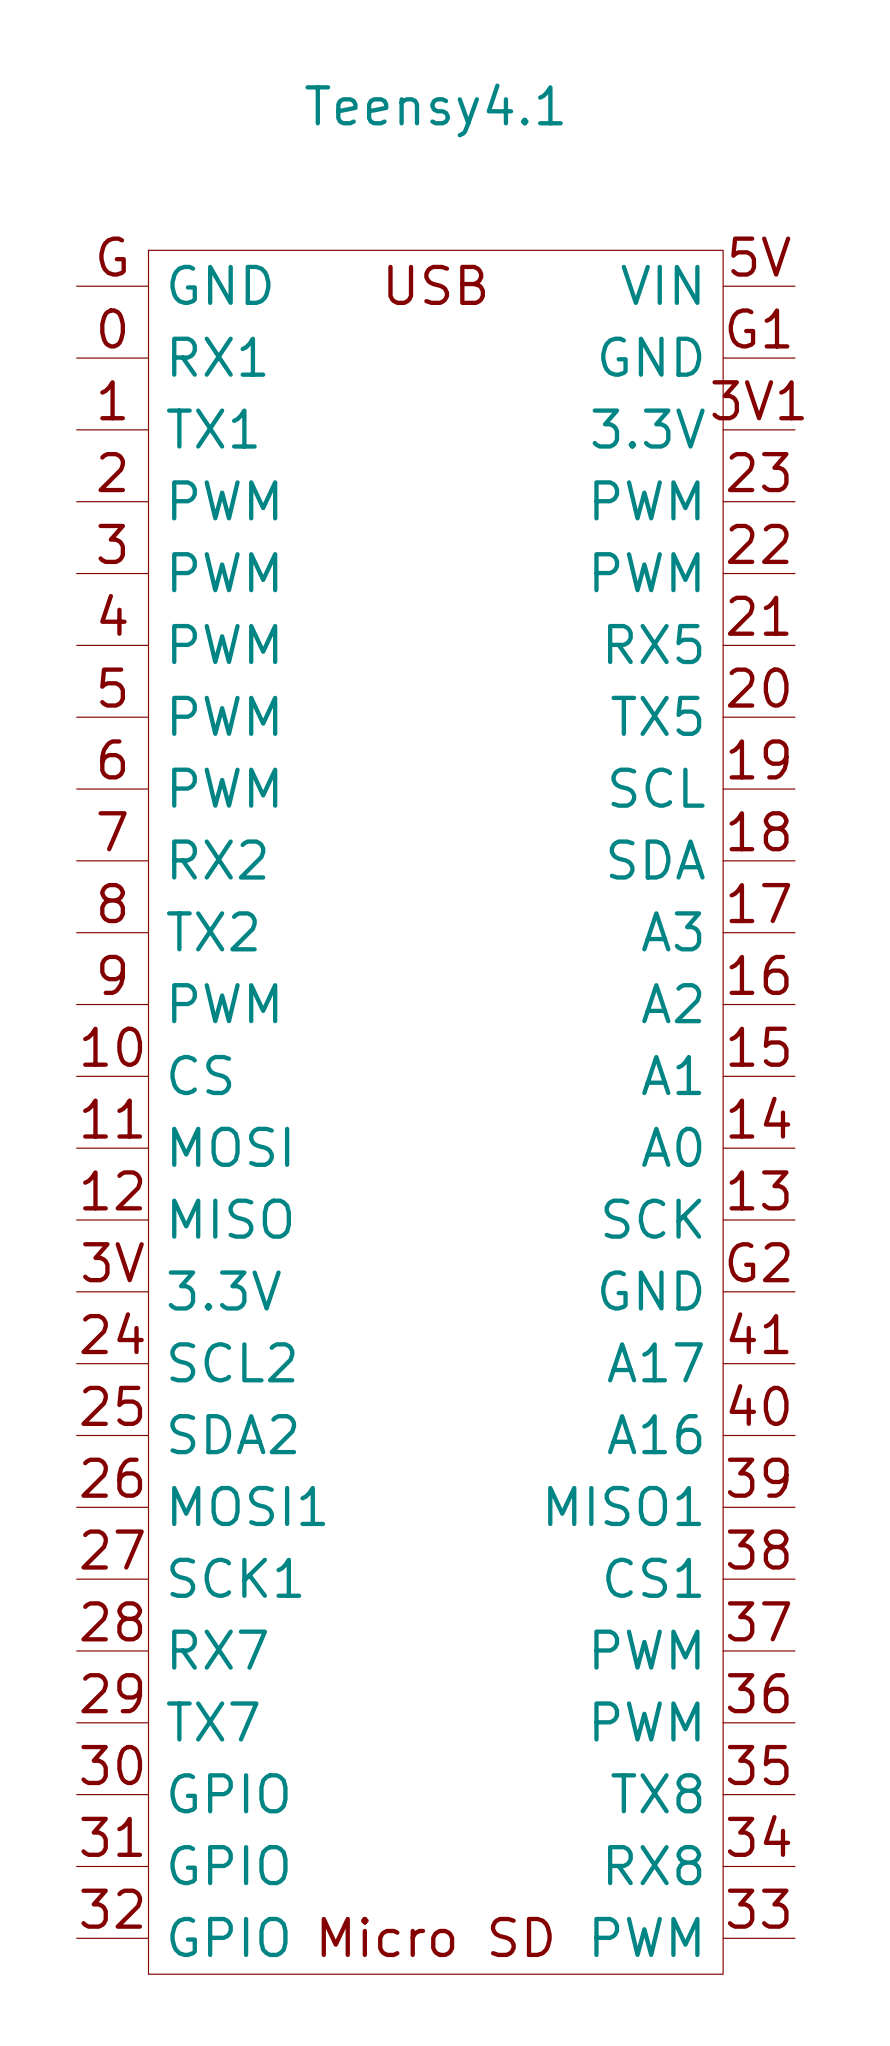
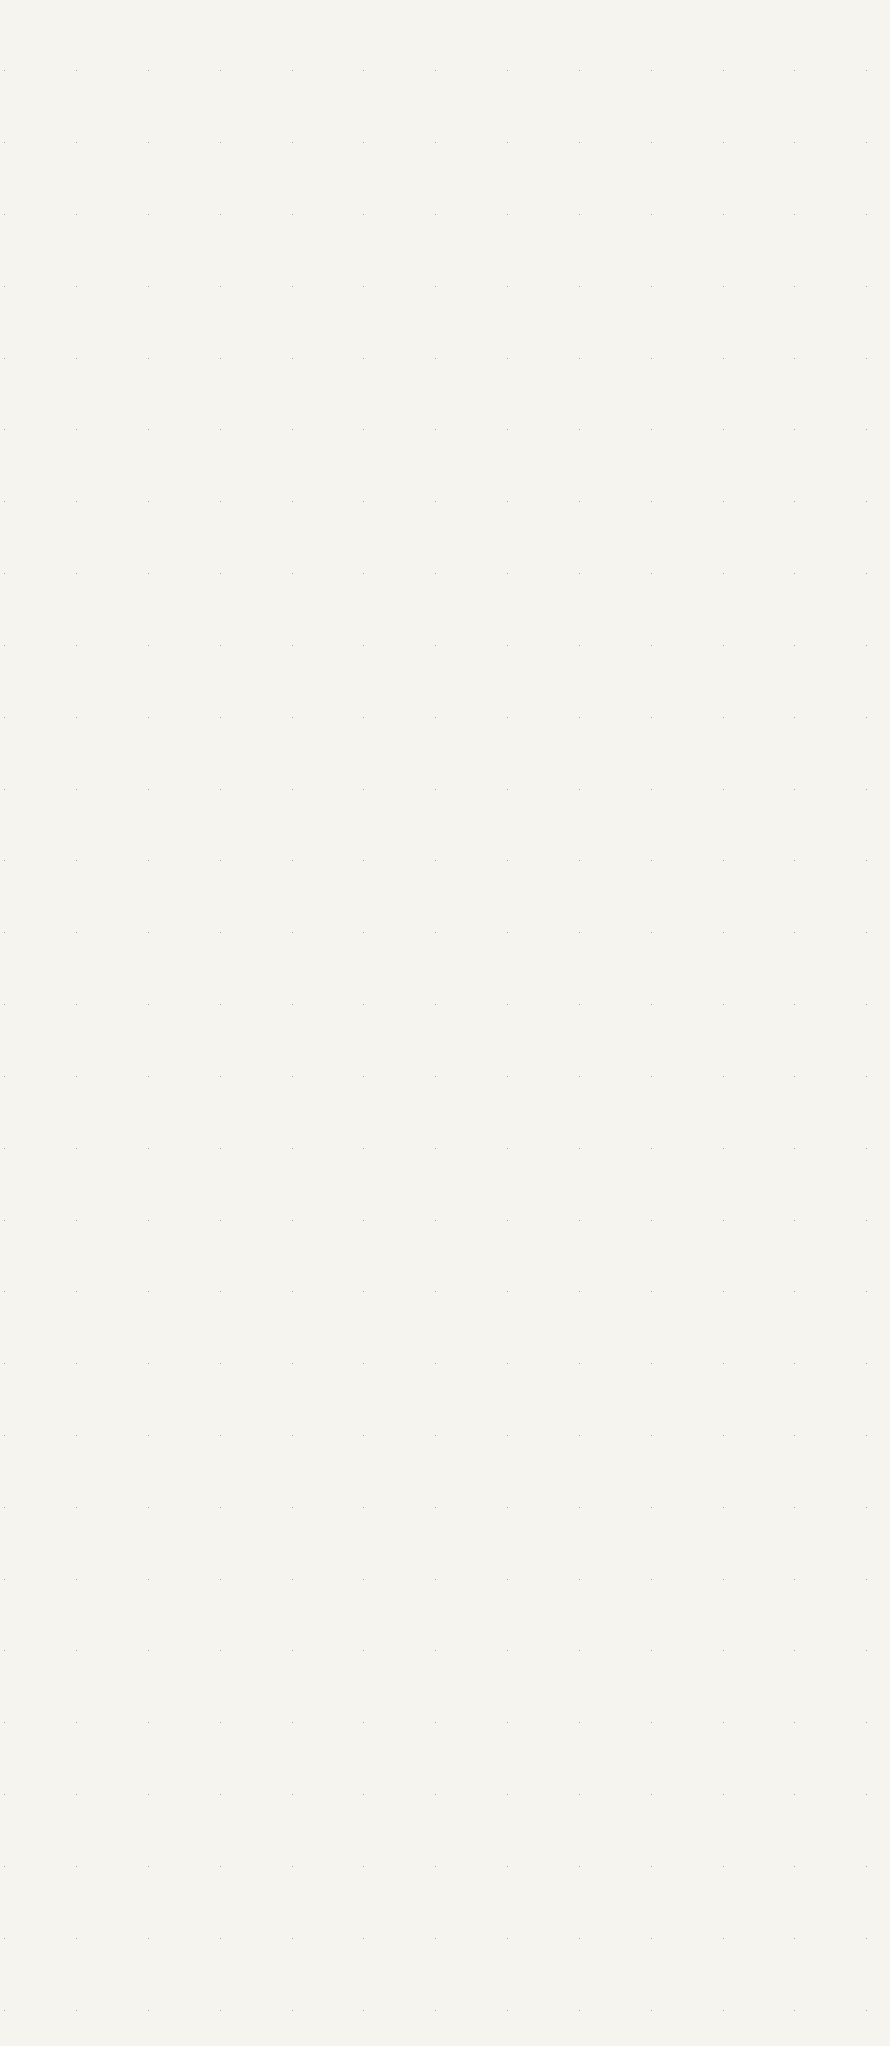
Teensy4.1: (435, 1112) -> none

